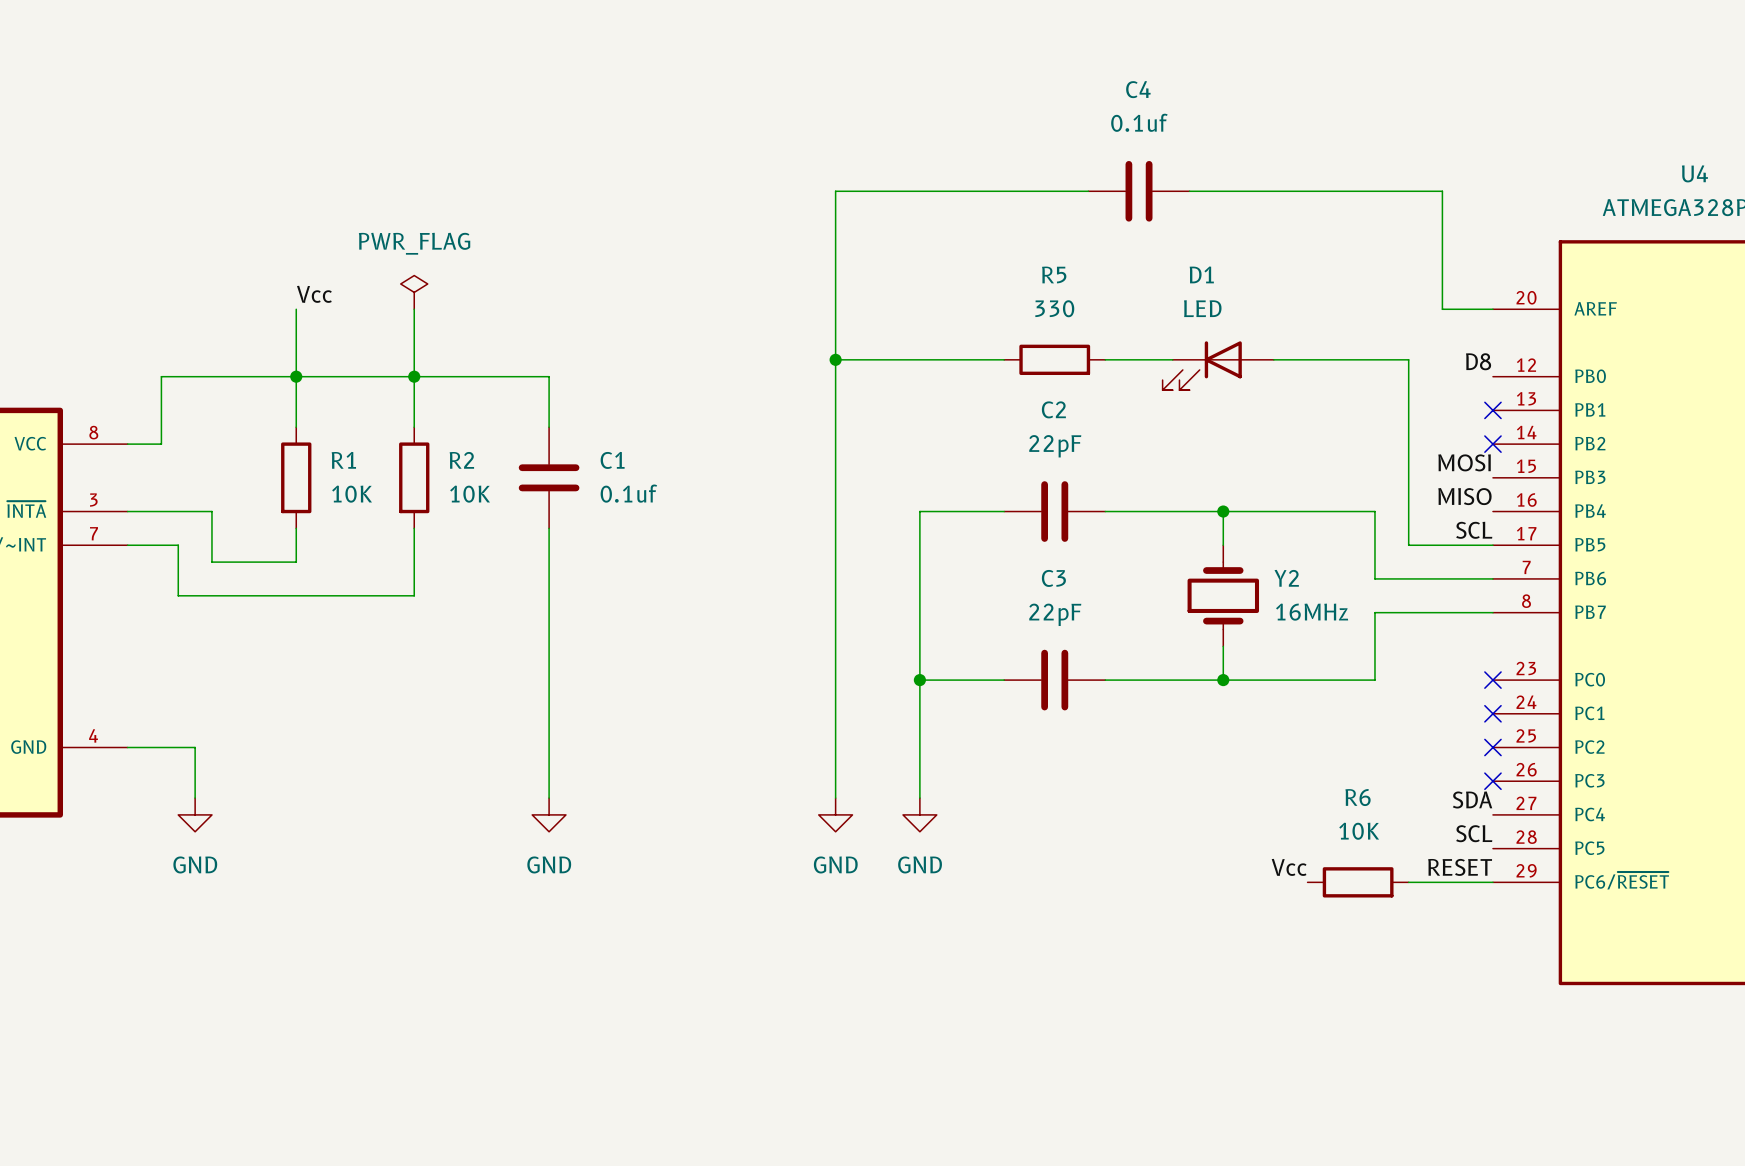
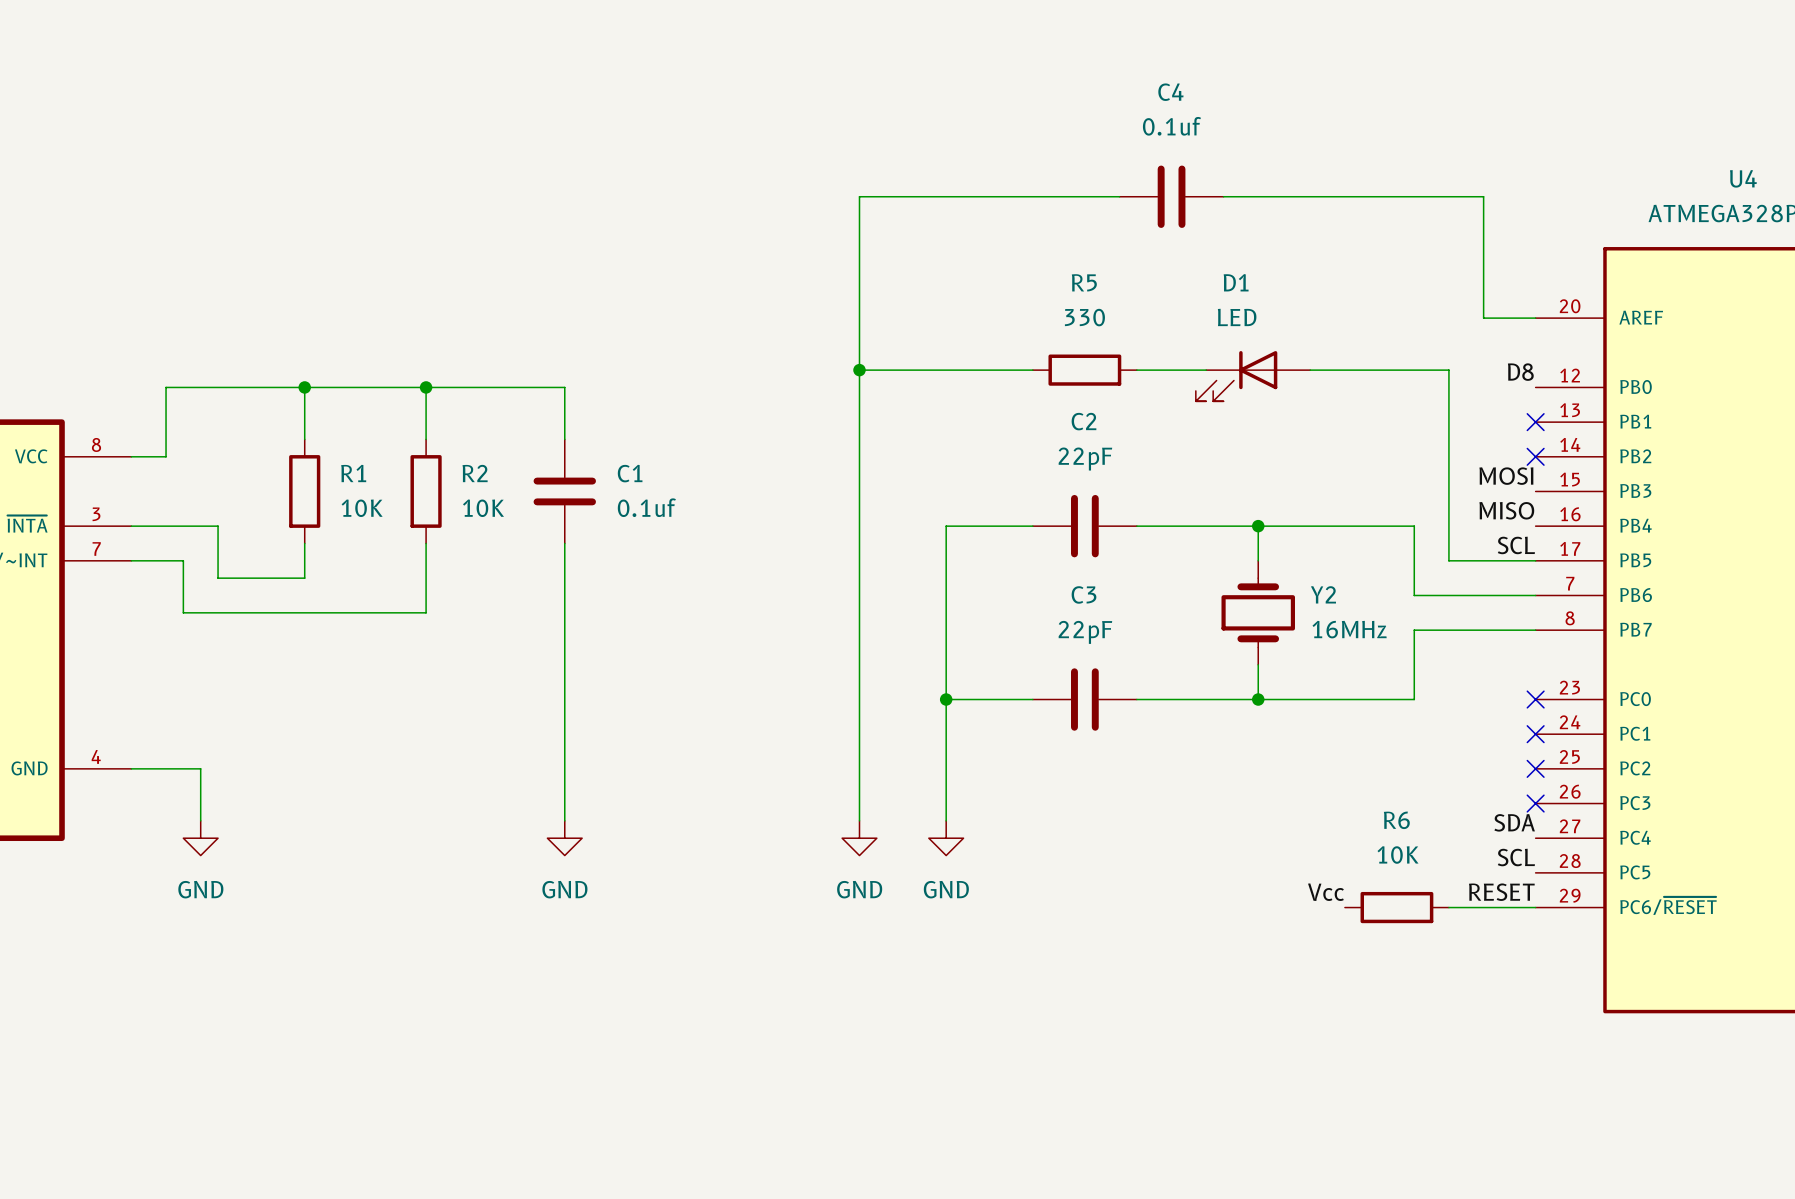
power symbol: PWR_FLAG (414, 292) -> none
label: Vcc (314, 294) -> none
wire: (296, 309) (296, 376) -> none
wire: (414, 309) (414, 376) -> none

